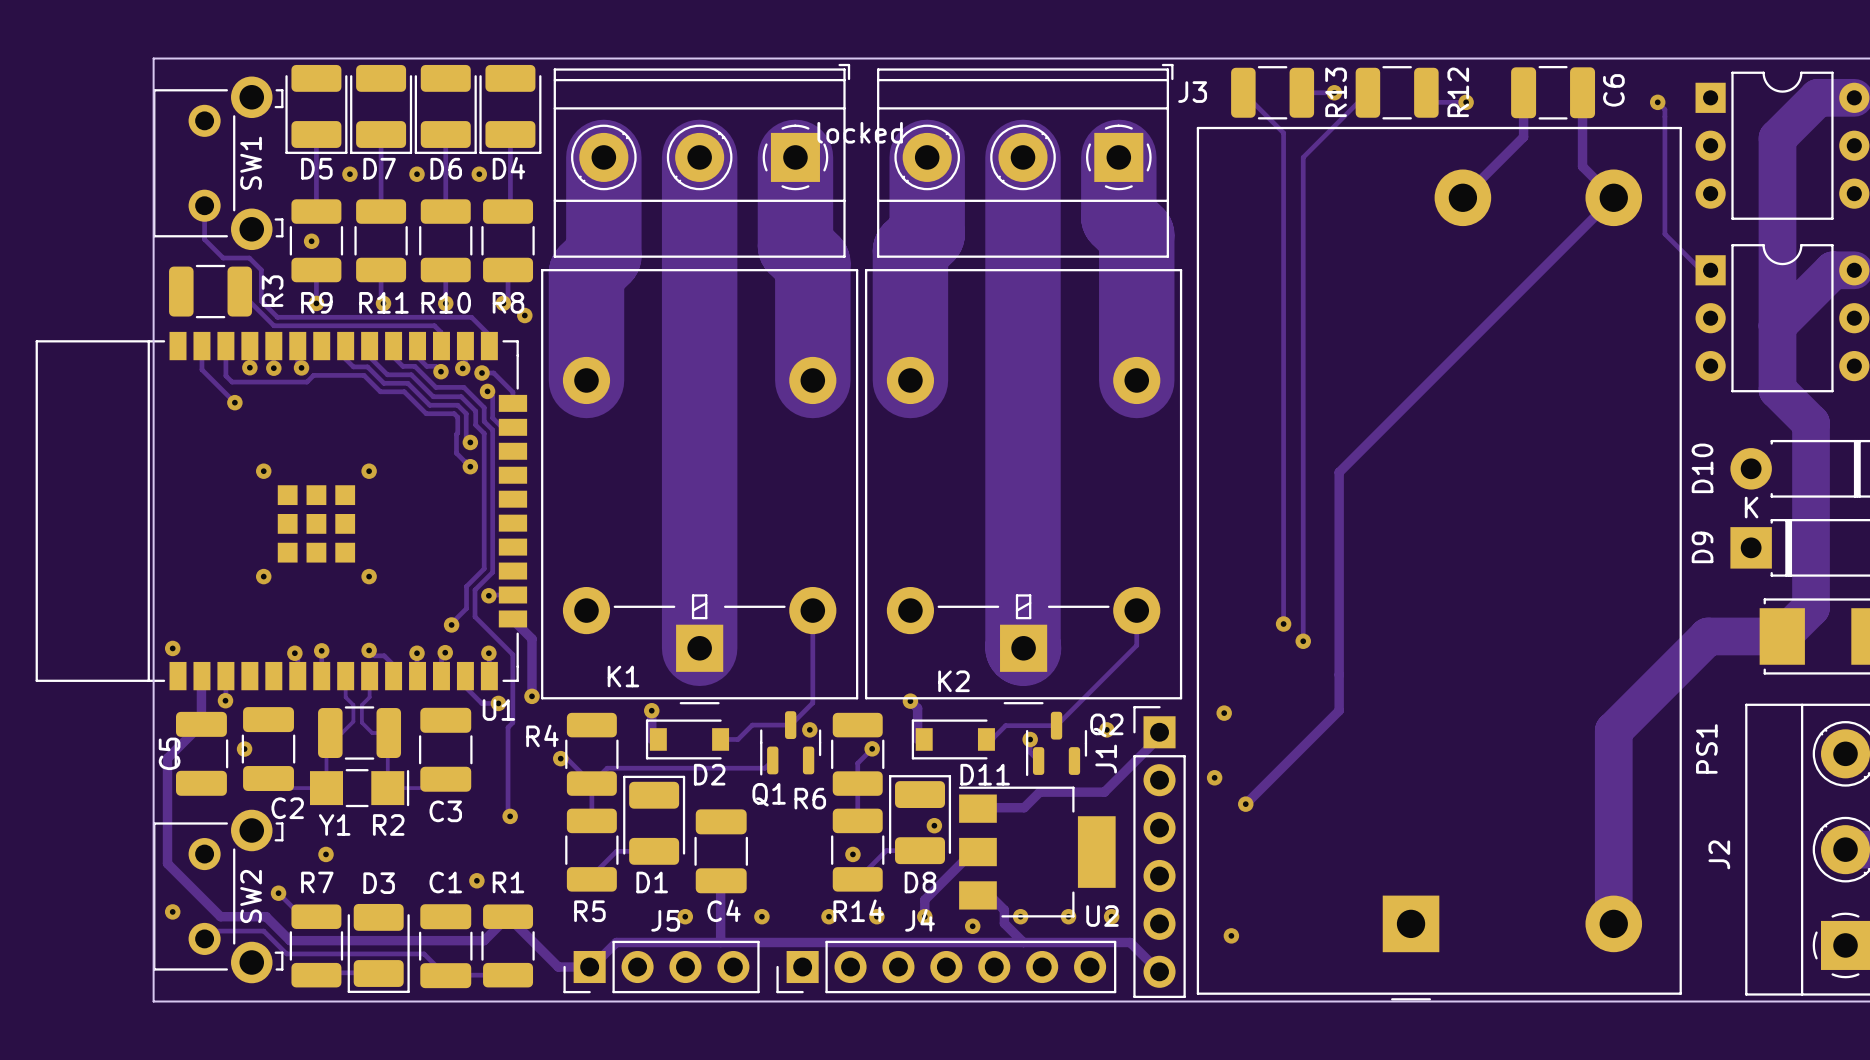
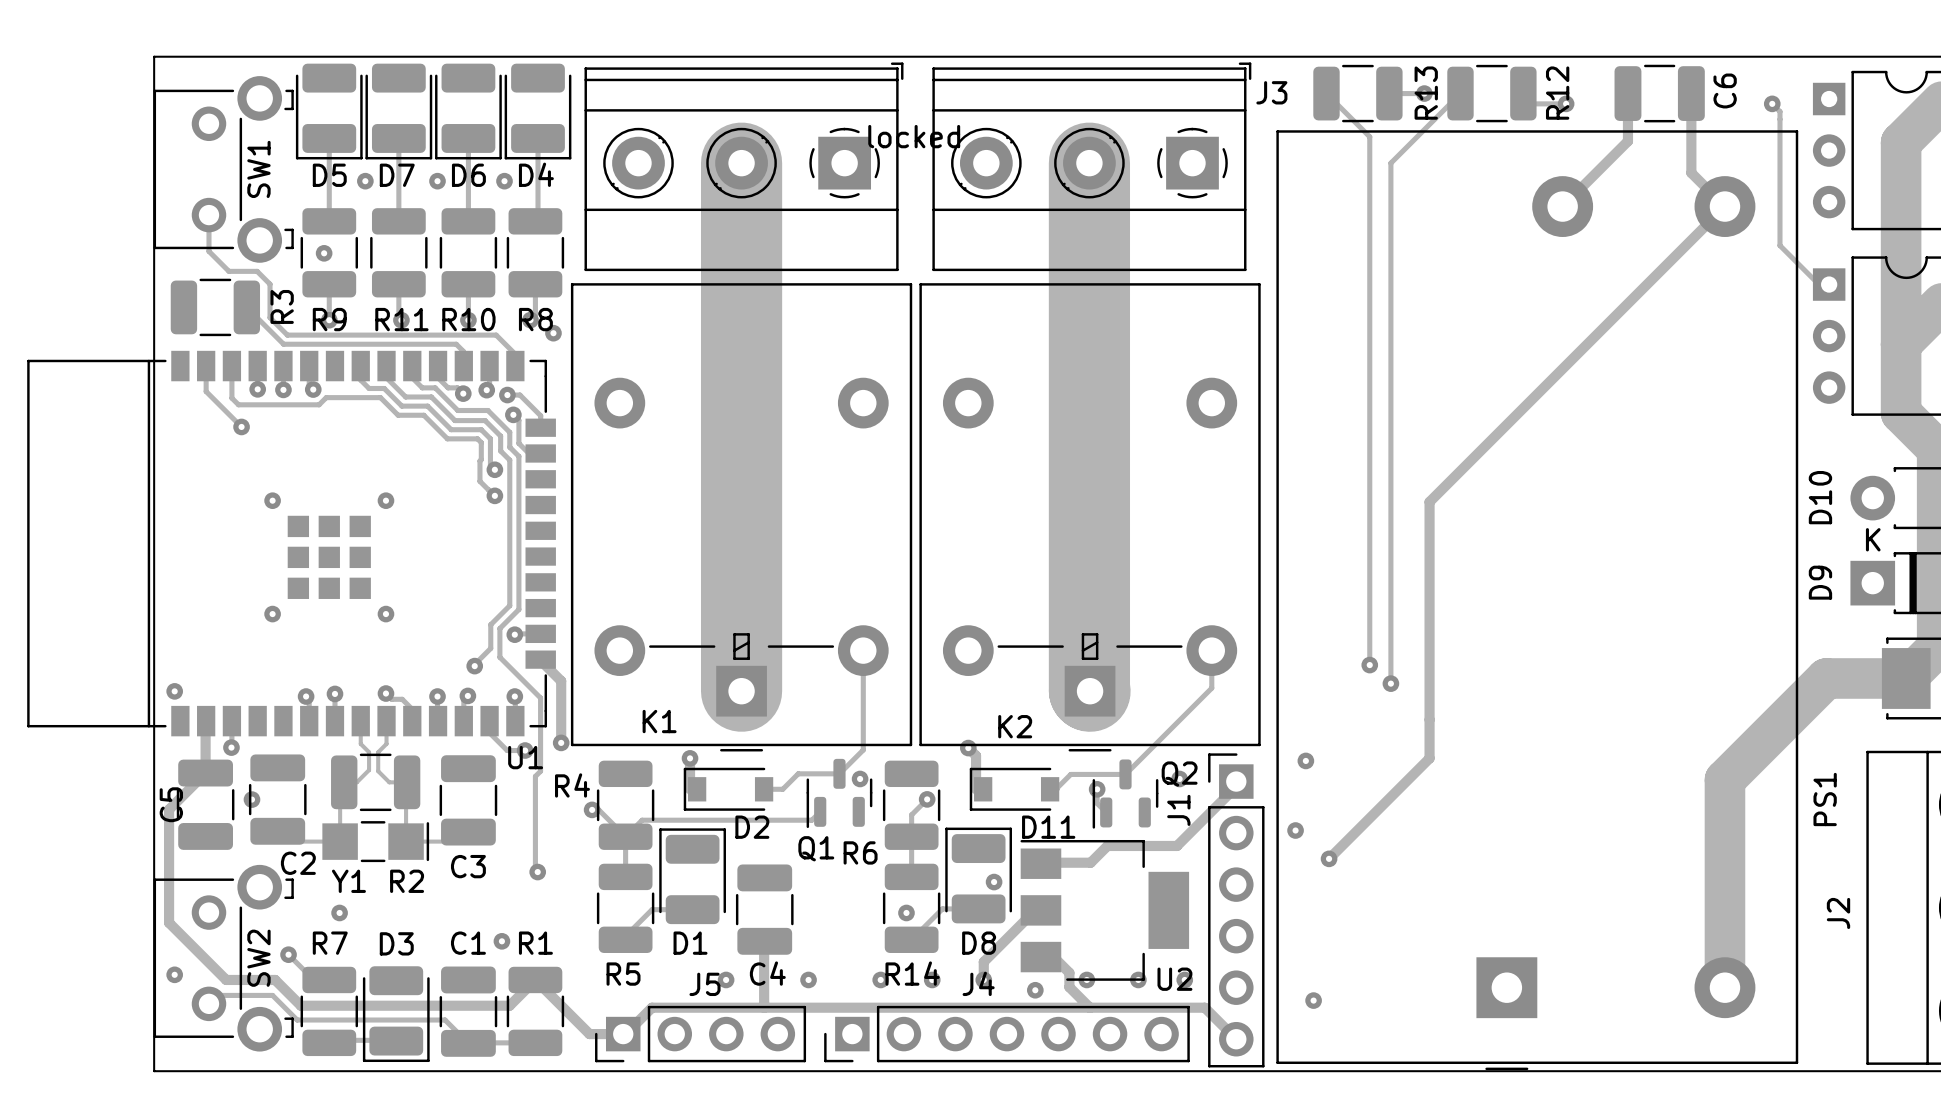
track: (603, 157) (603, 255) (586, 272) (586, 380) -> none
track: (795, 157) (795, 246) (812, 263) (812, 380) -> none
track: (927, 157) (927, 234) (910, 250) (910, 380) -> none
track: (1118, 157) (1118, 217) (1136, 235) (1136, 380) -> none

